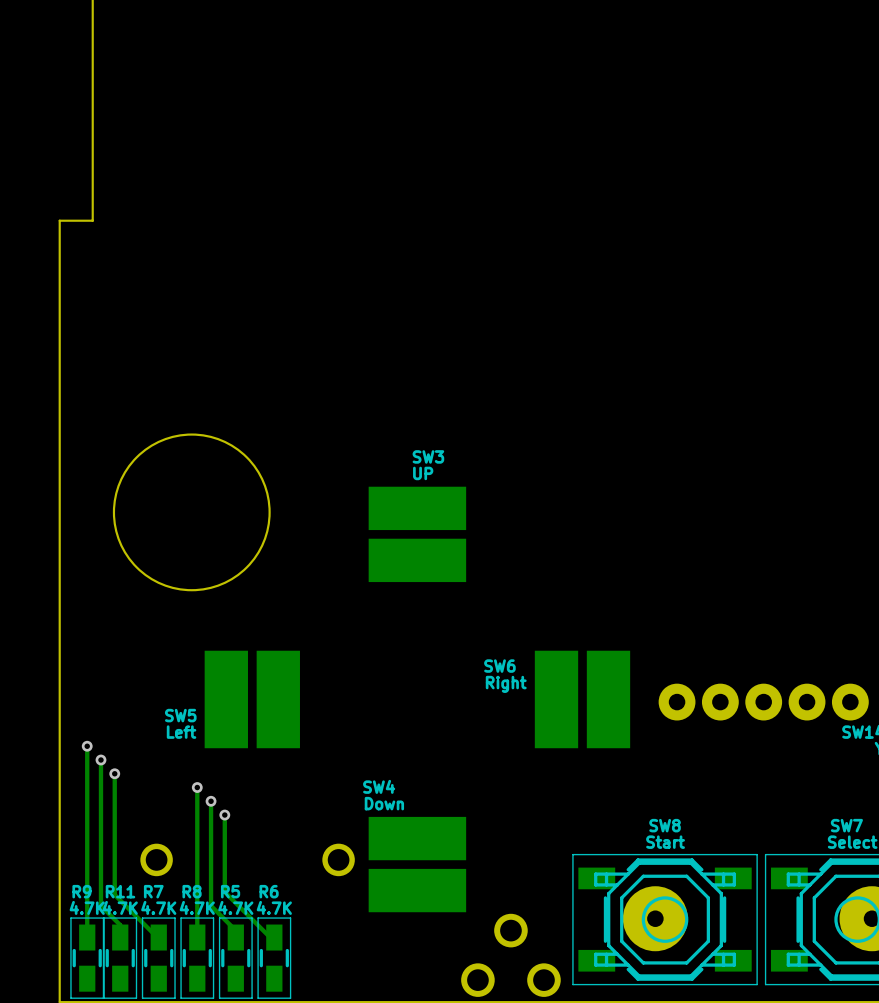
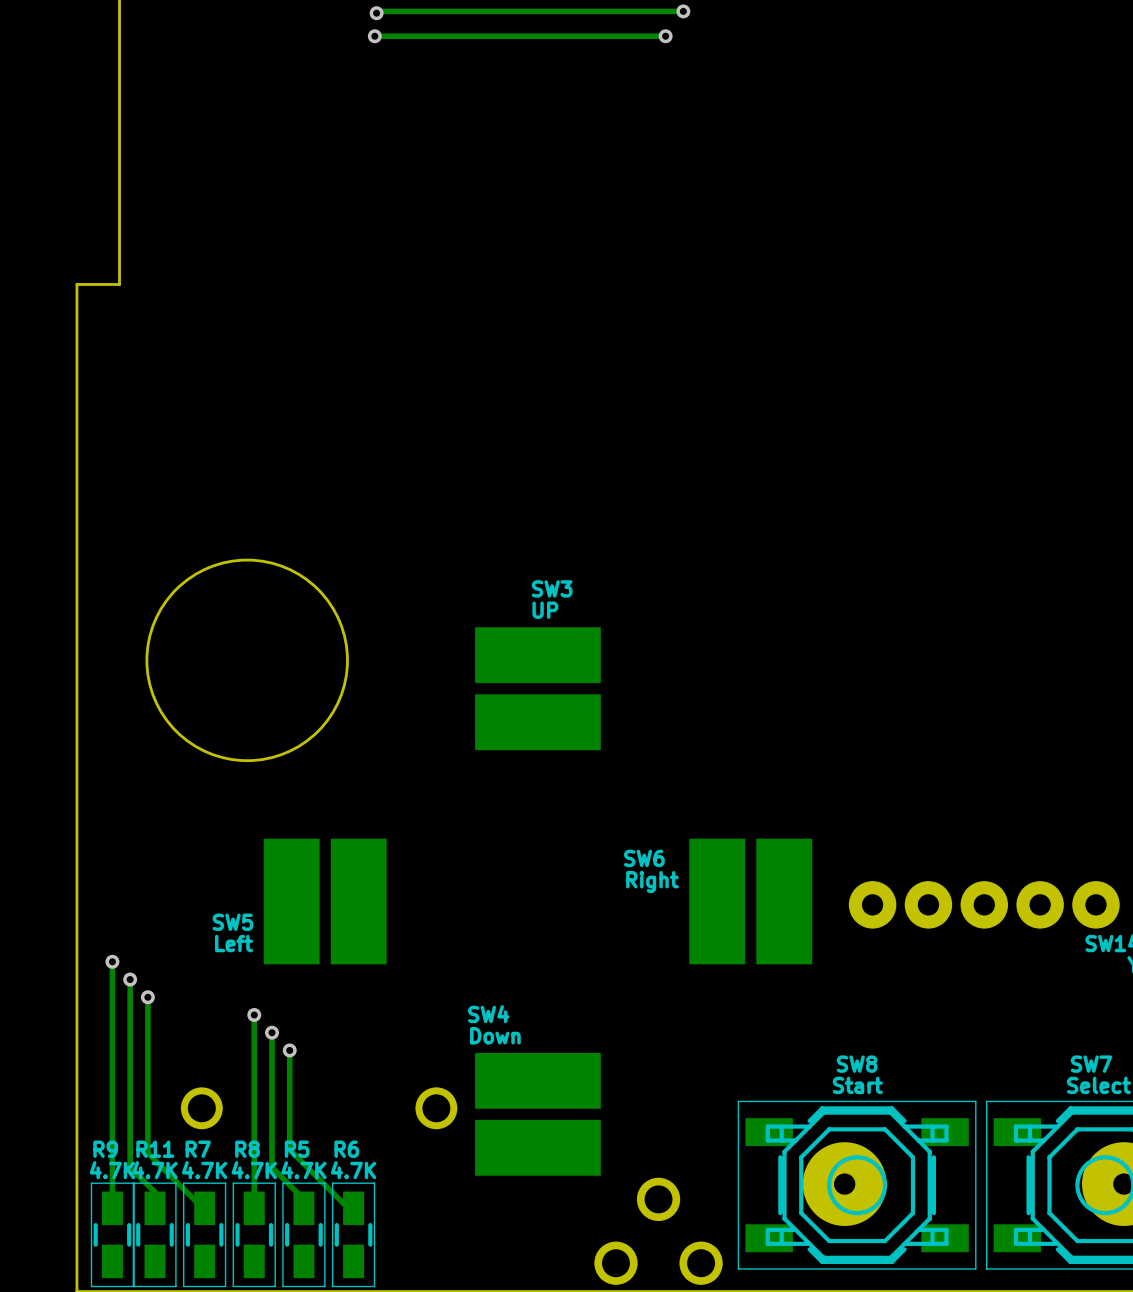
track: none -> (683, 11) (374, 11)
via: none -> (683, 11)
via: none -> (376, 13)
via: none -> (374, 36)
track: none -> (665, 36) (374, 36)
via: none -> (665, 36)

